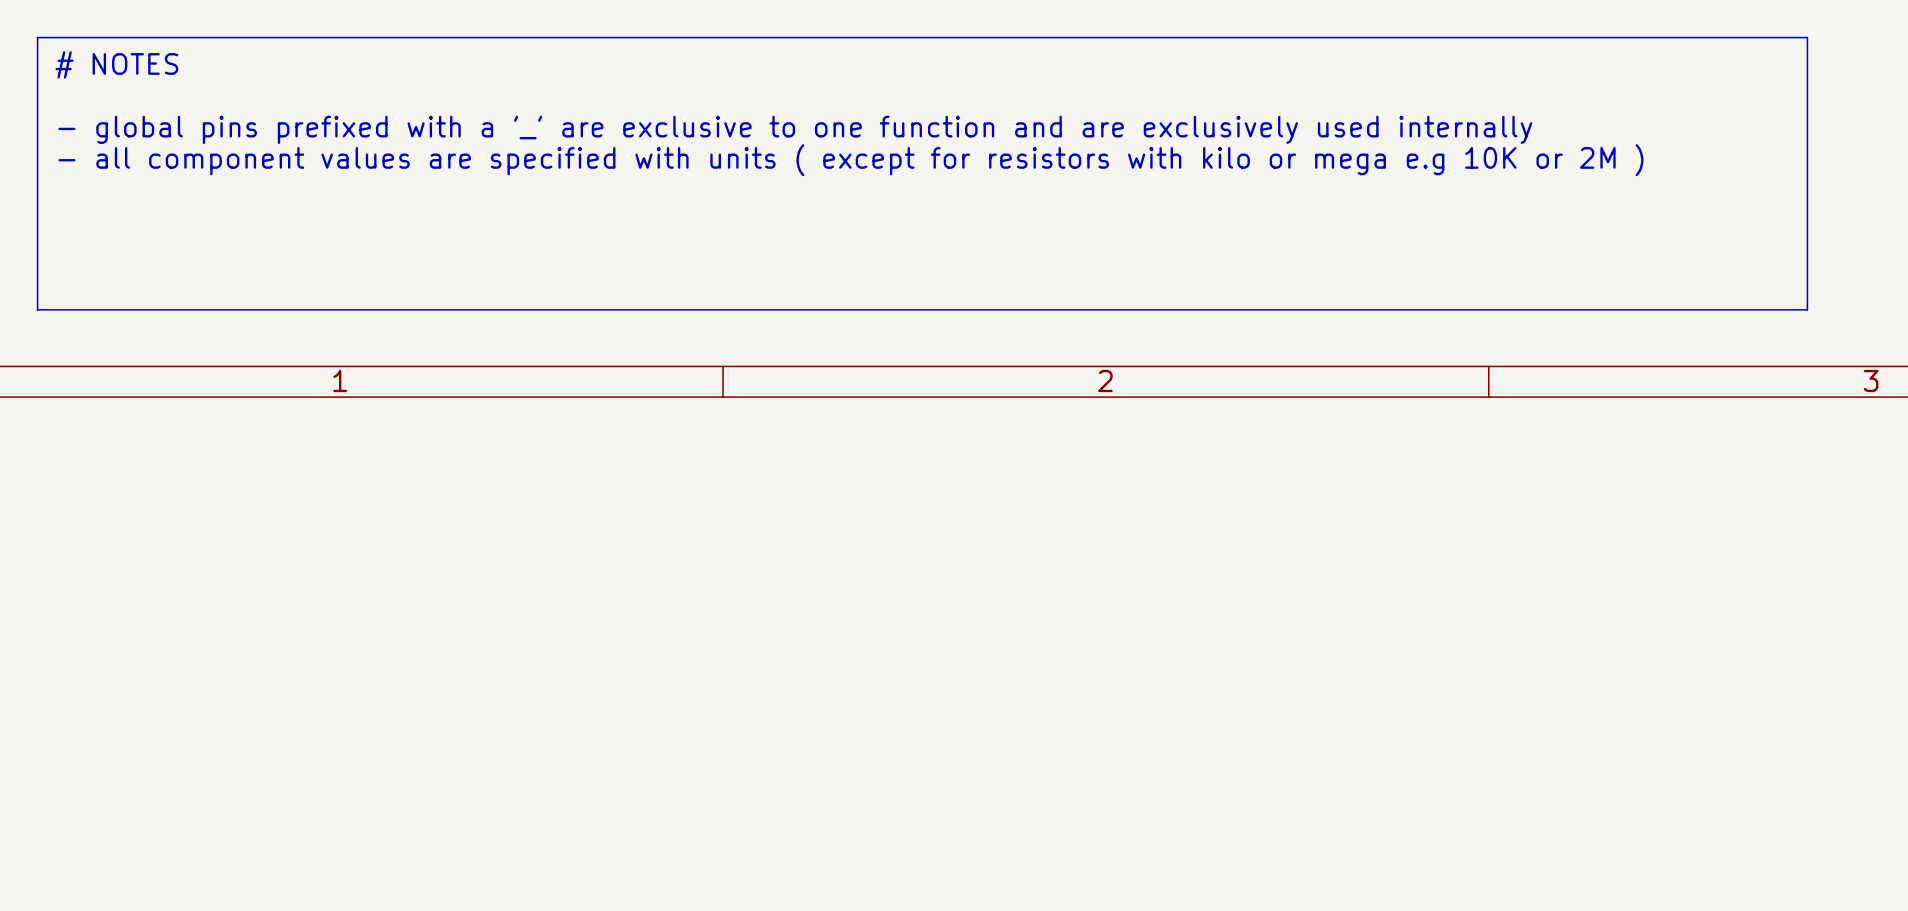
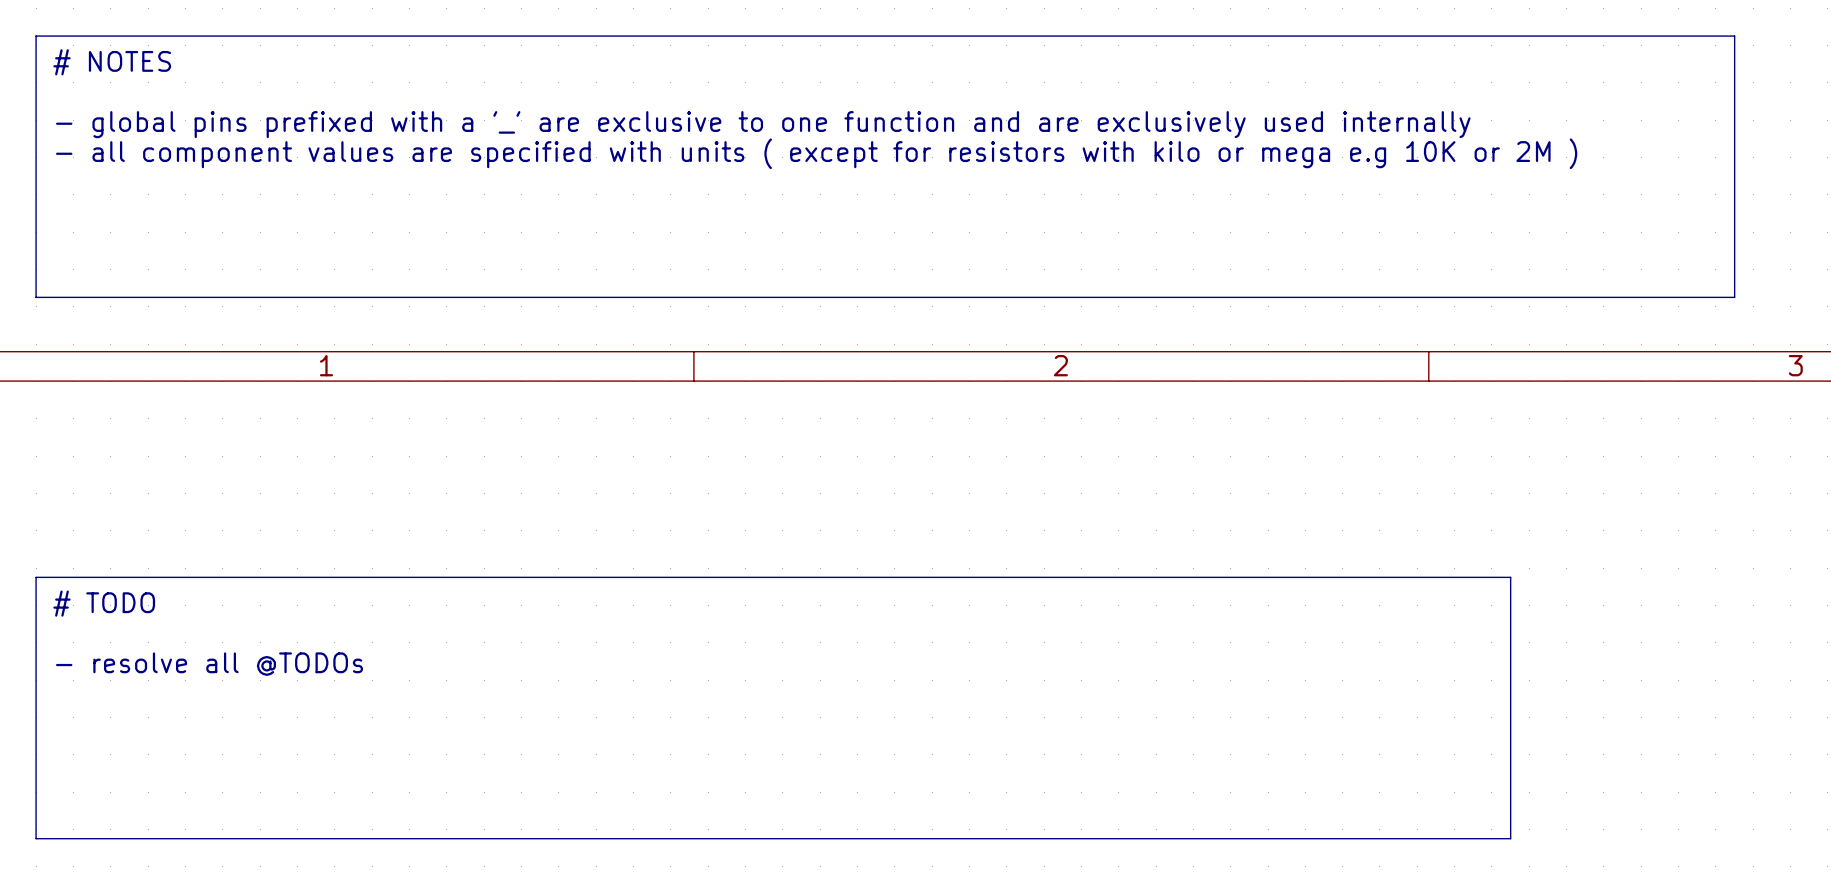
line: none -> (36, 577) (1510, 577) (1510, 838) (36, 838) (36, 577)
text: none -> # TODO (104, 603)
text: none -> - resolve all @TODOs (209, 664)

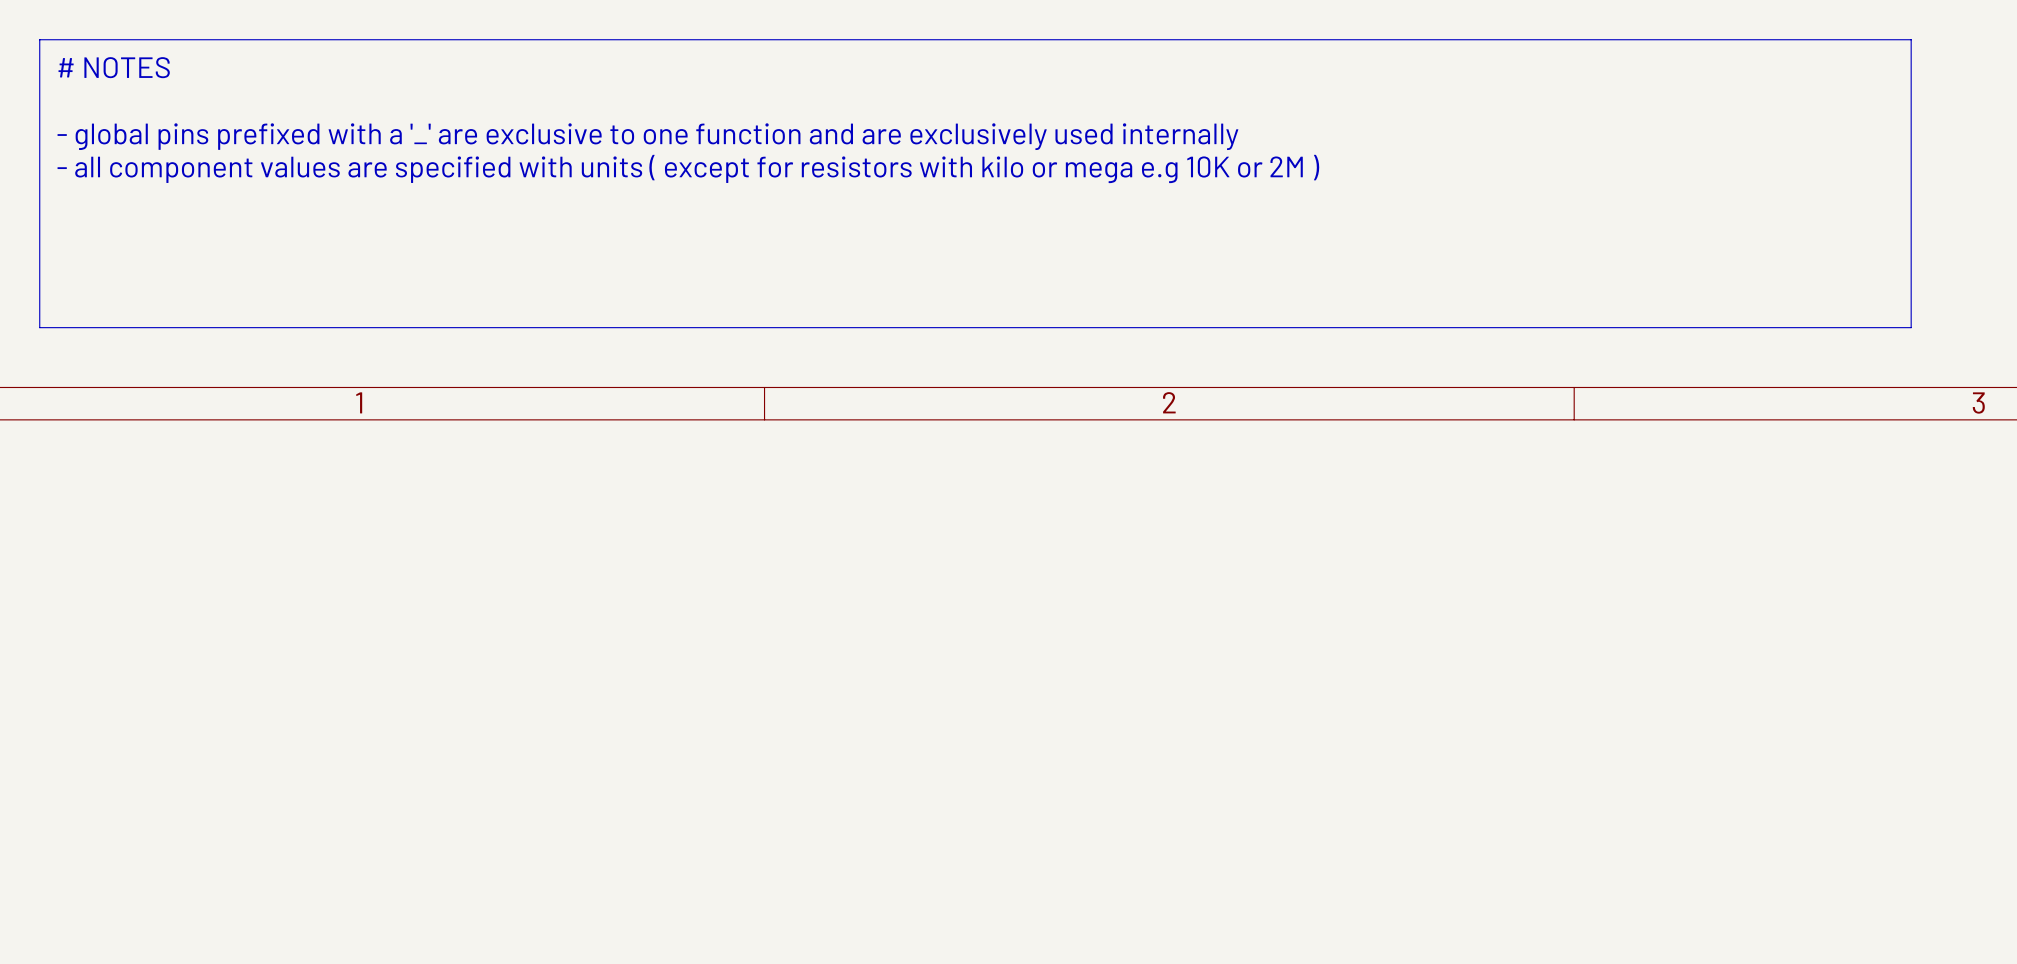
line: (36, 577) (1510, 577) (1510, 838) (36, 838) (36, 577) -> none
text: # TODO (104, 603) -> none
text: - resolve all @TODOs (209, 664) -> none

